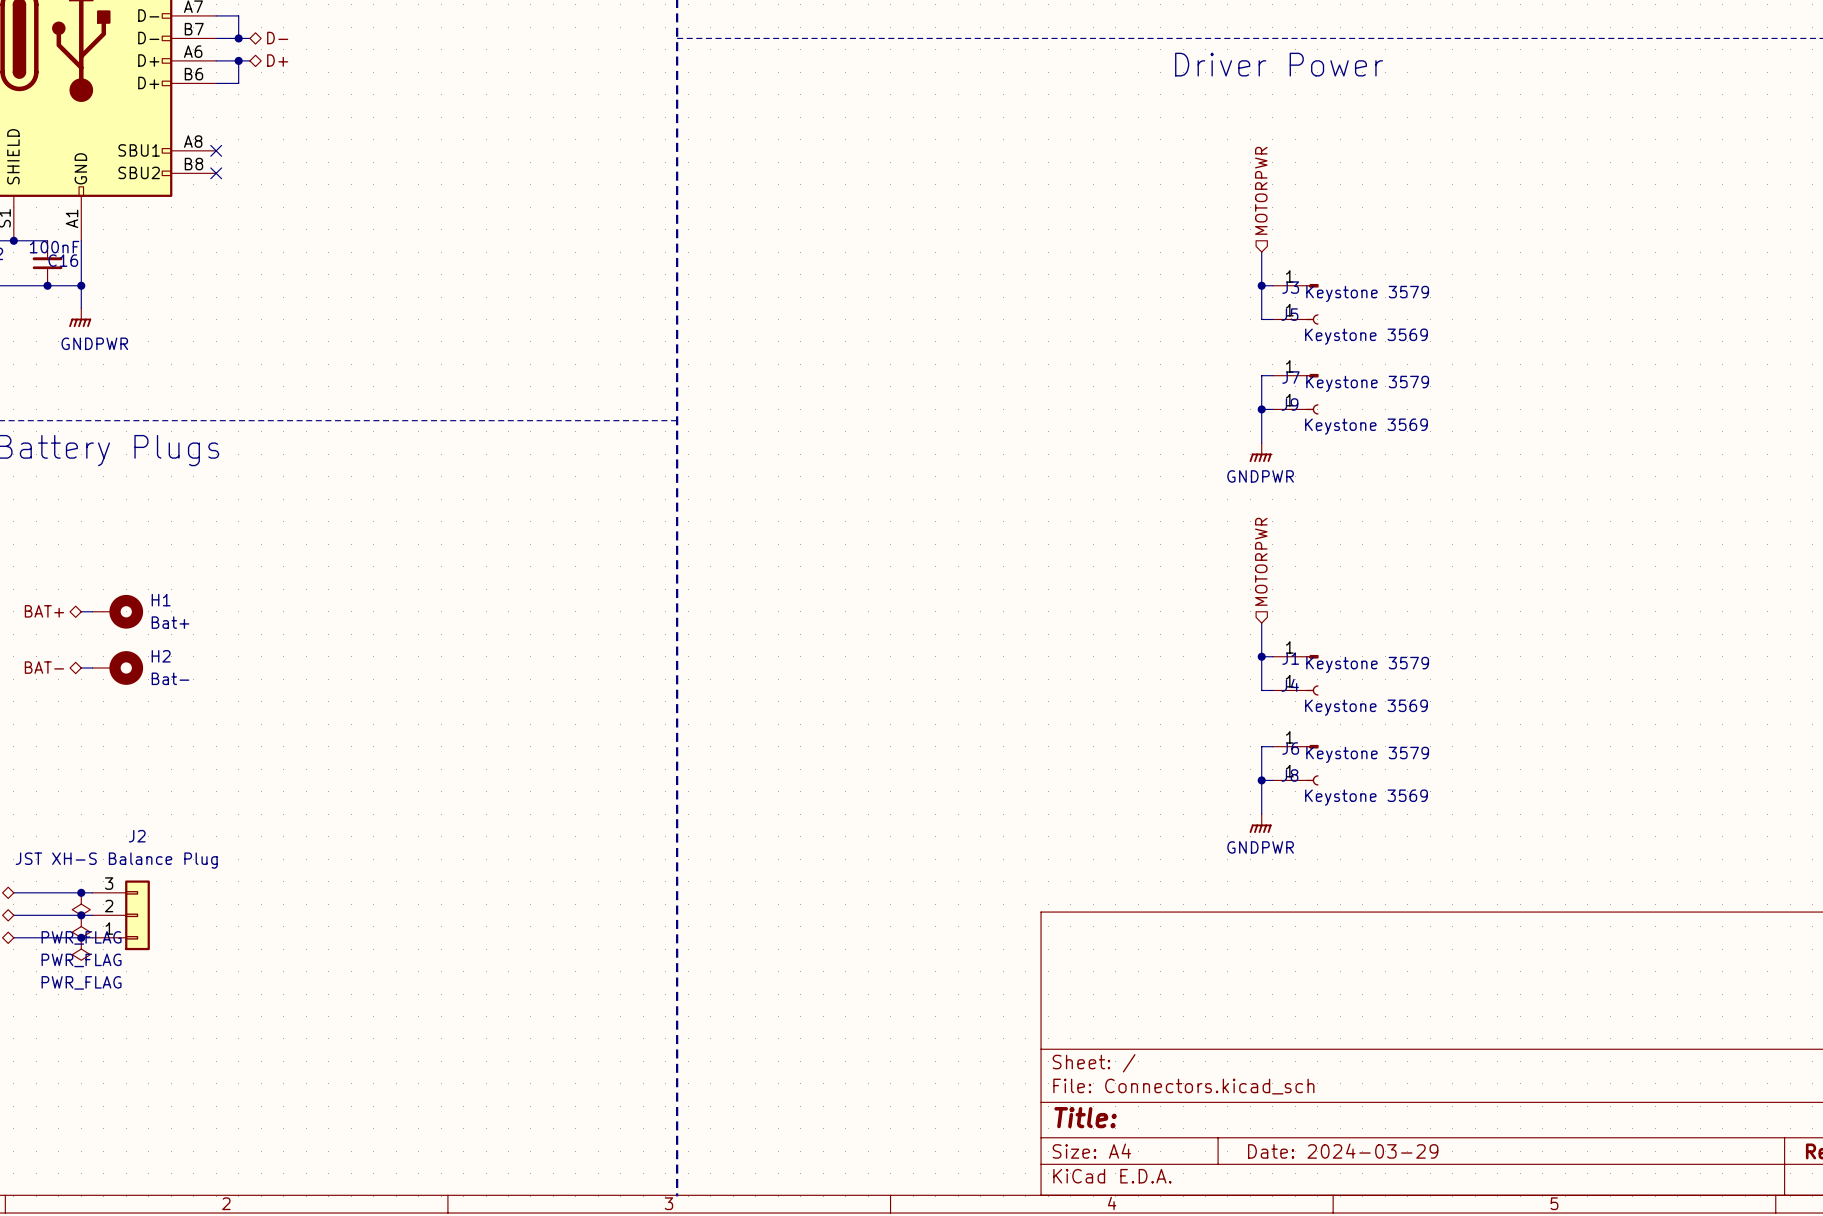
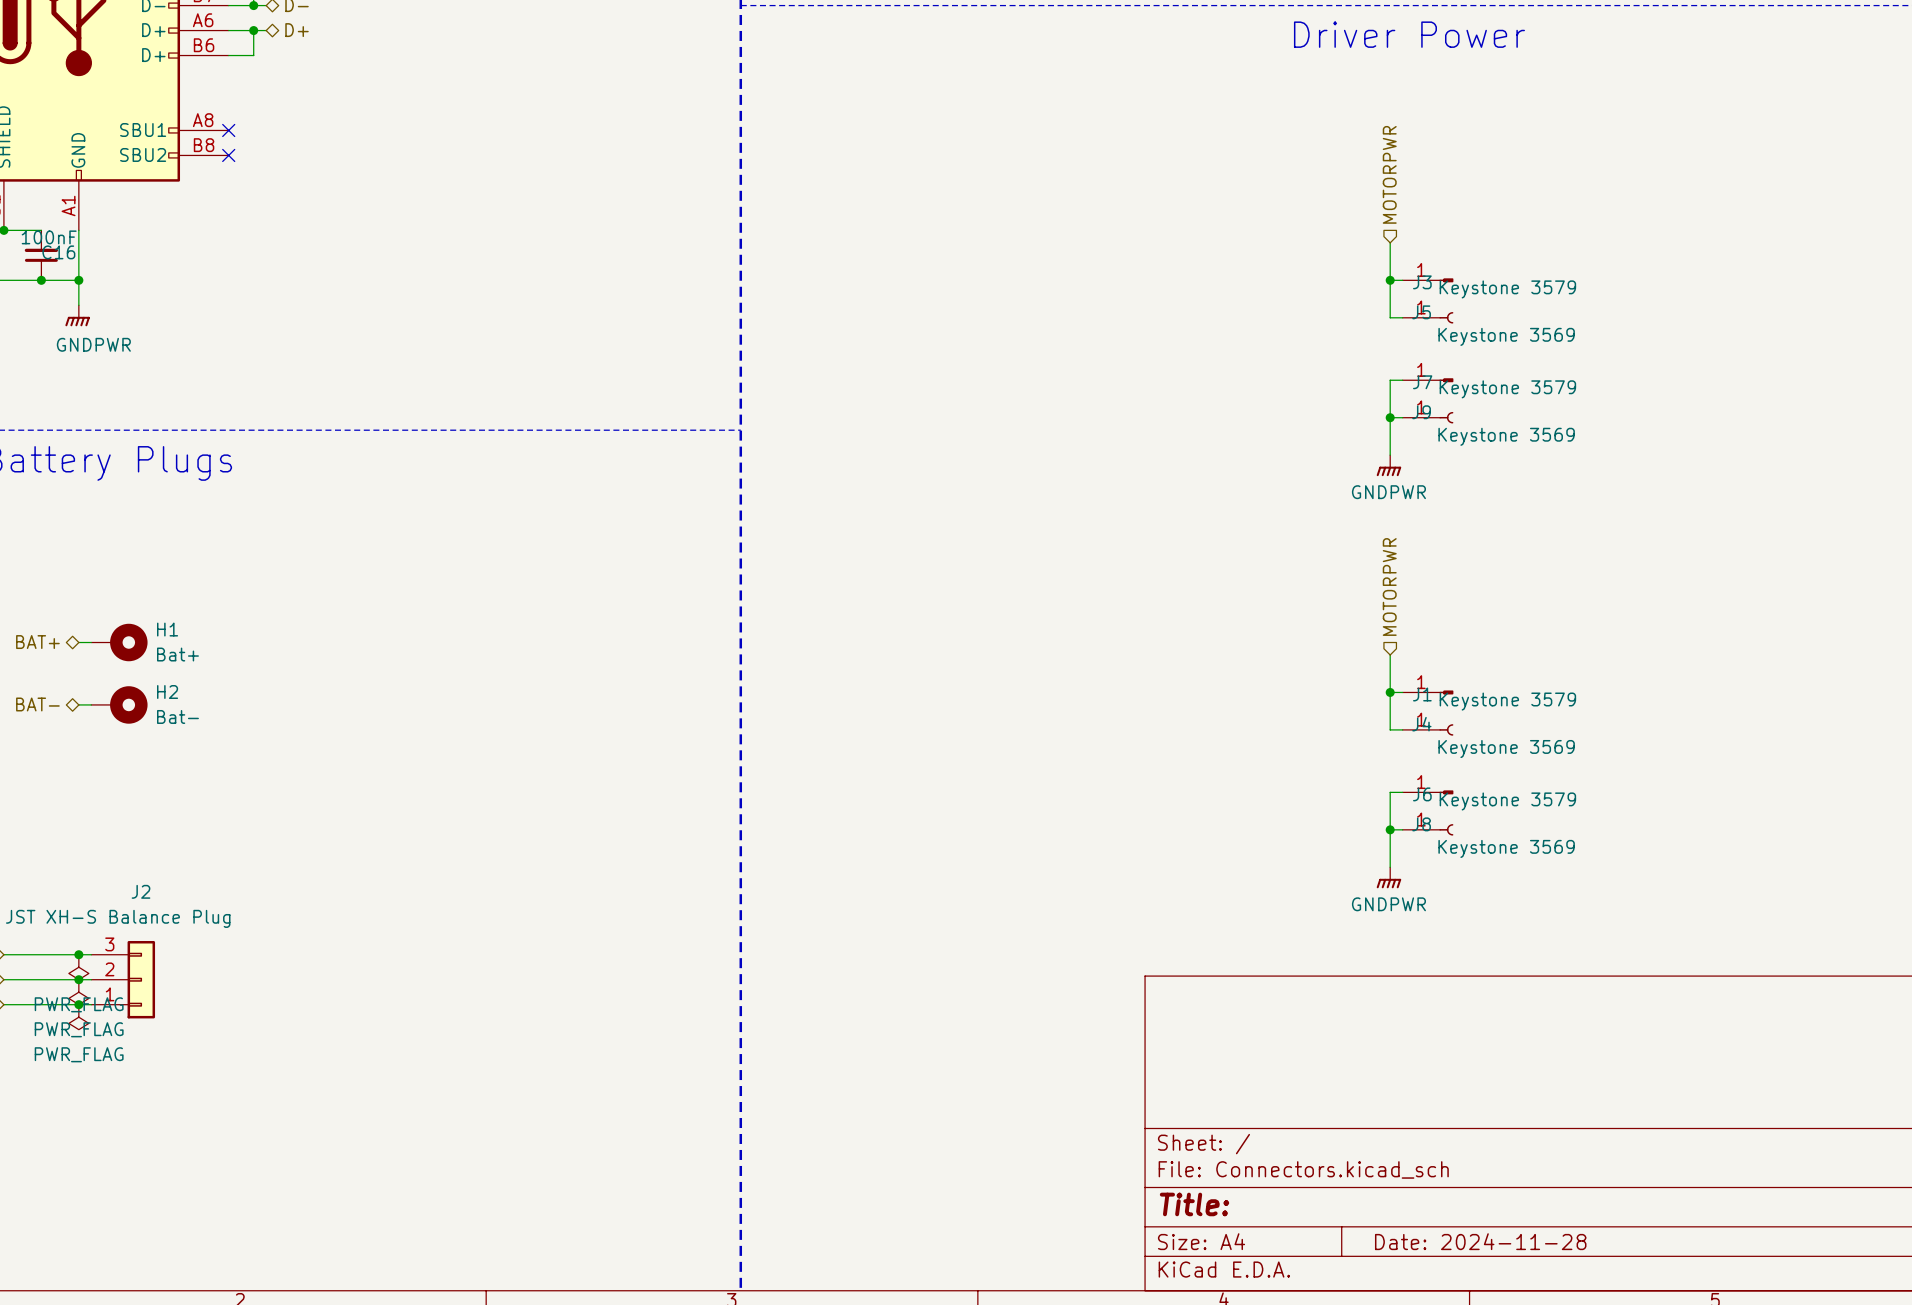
title block: Date: 2024-03-29 (1343, 1151) -> Date: 2024-11-28 (1480, 1241)

